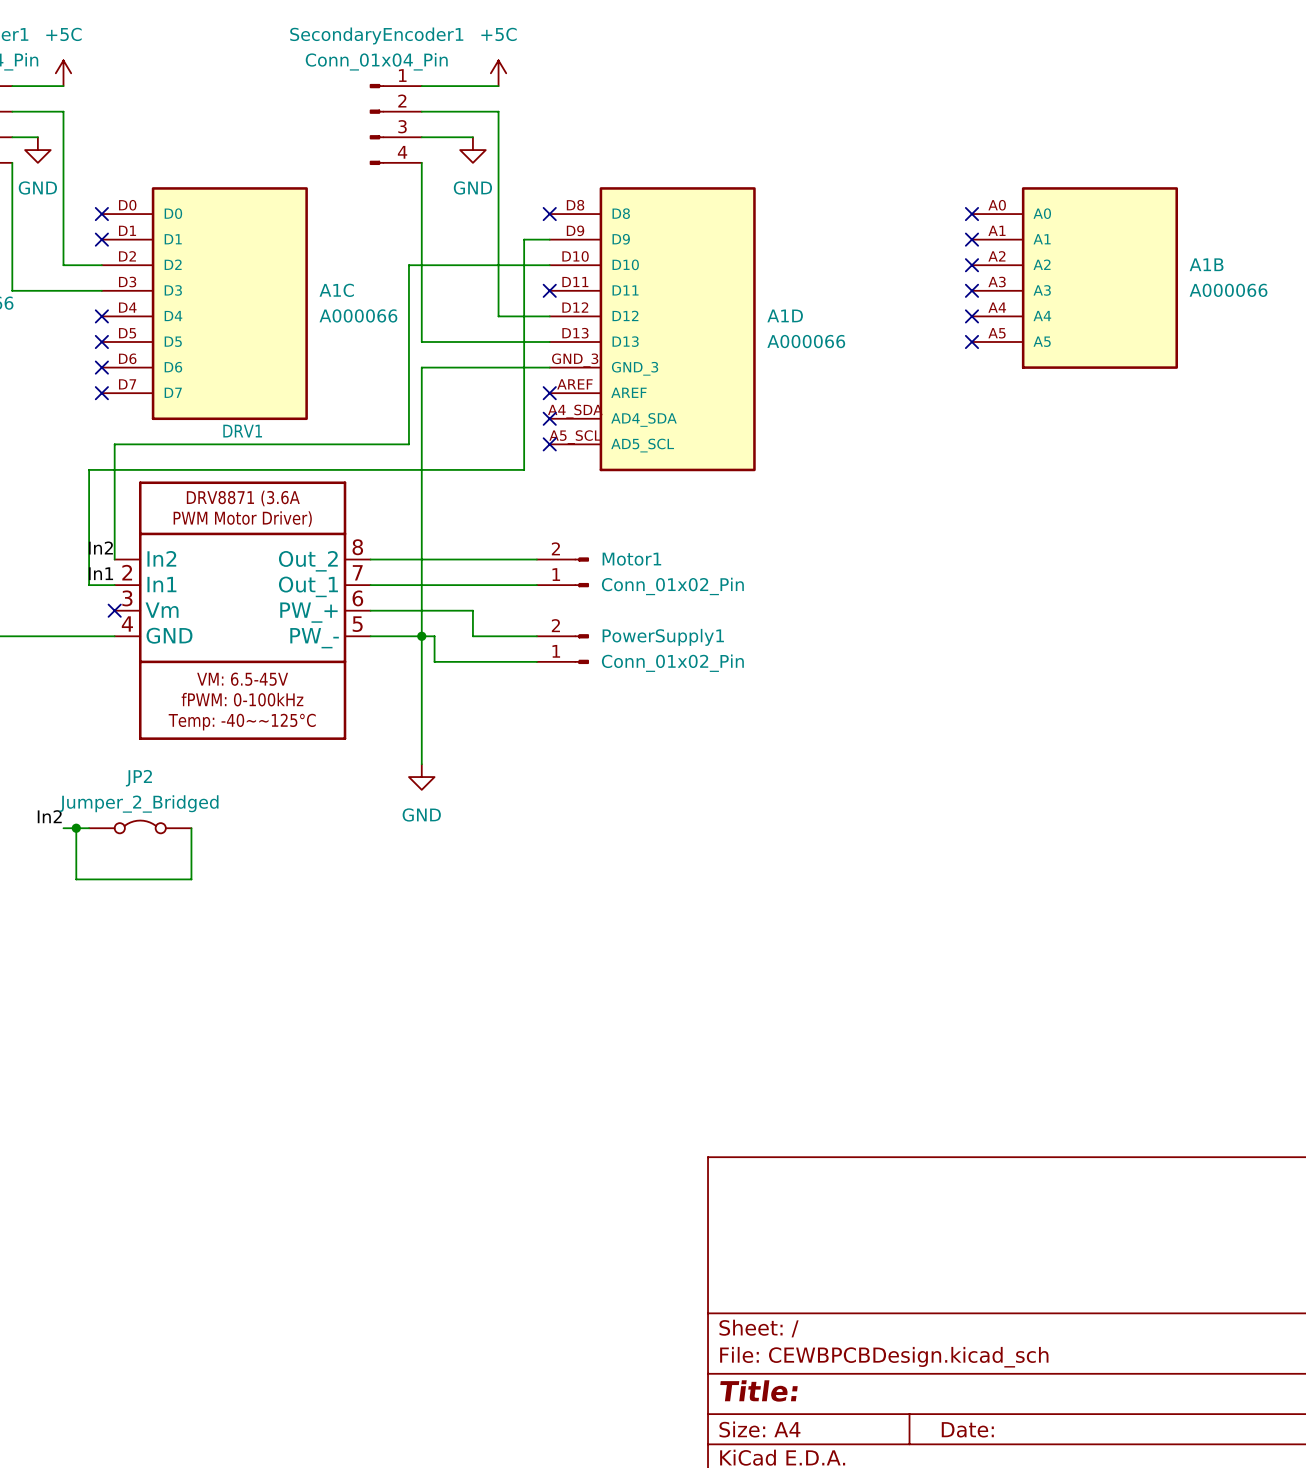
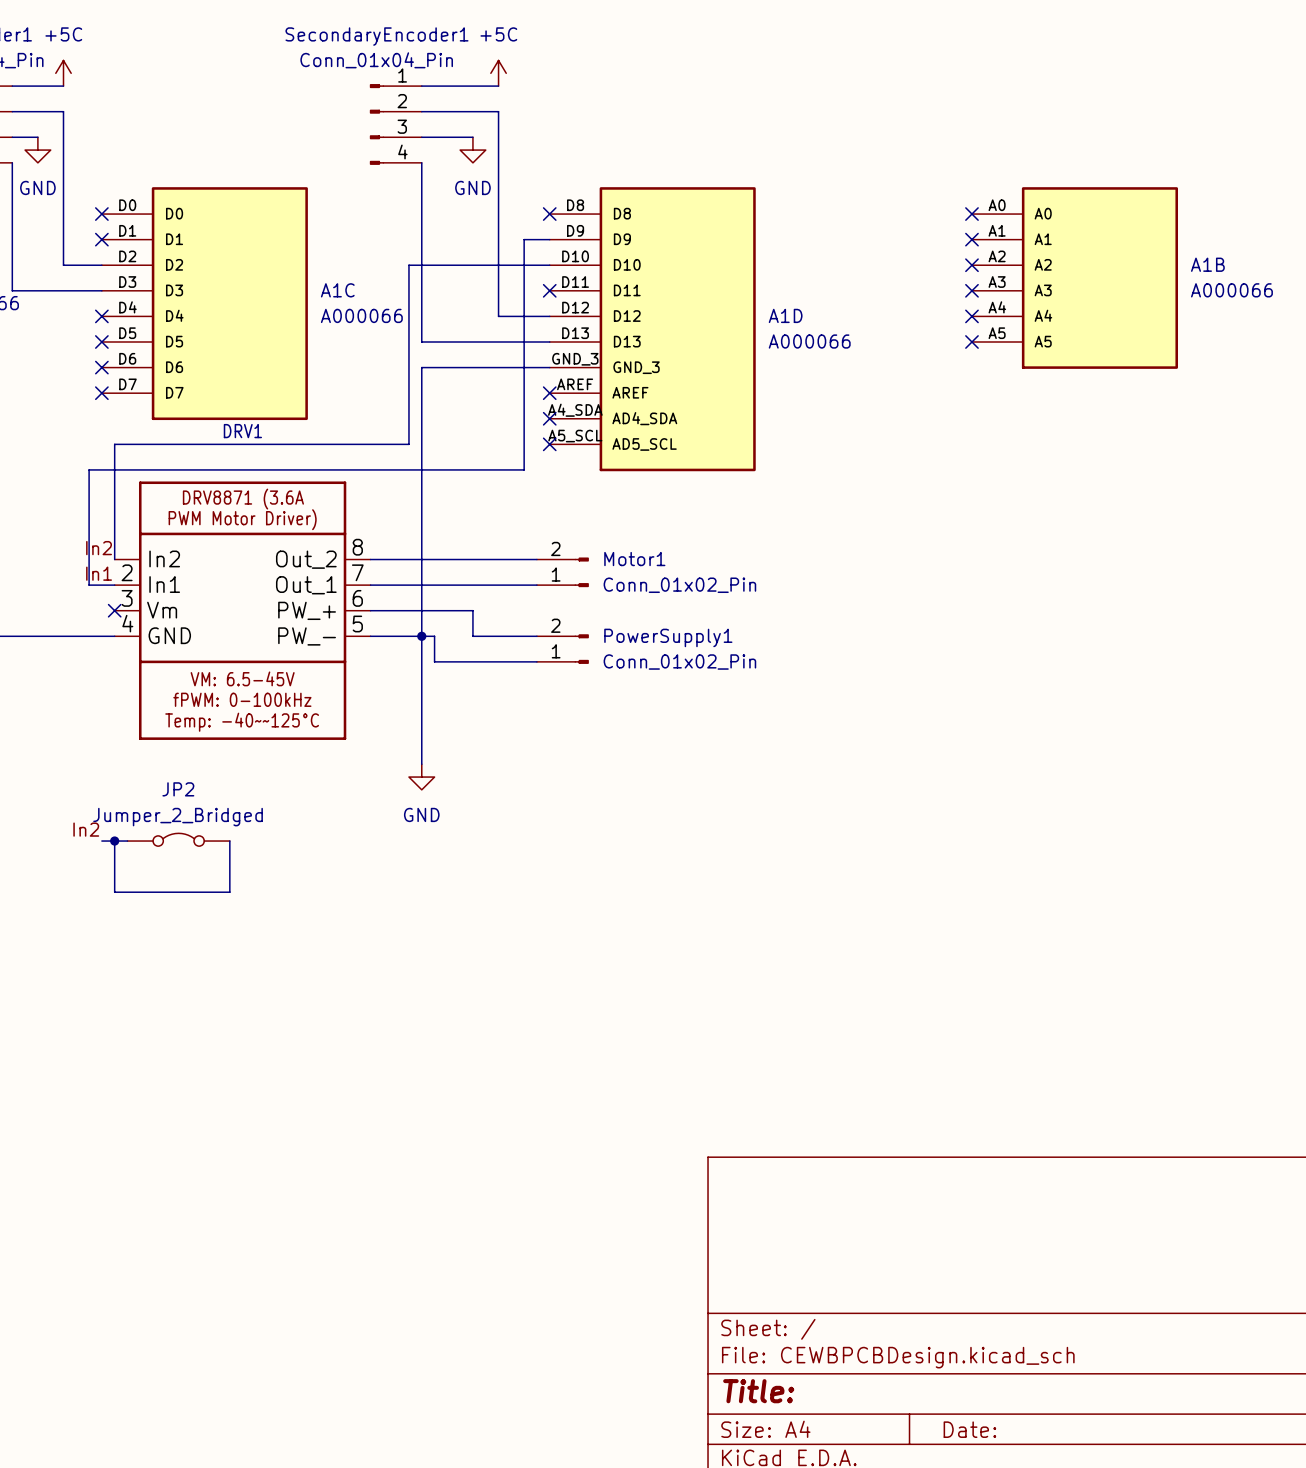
label position: In2 (49, 816) -> In2 (86, 829)
JP2 position: (140, 826) -> (178, 839)
wire: (63, 828) (89, 828) -> (101, 841) (127, 841)
wire: (76, 828) (76, 879) (191, 879) (191, 828) -> (114, 841) (114, 892) (229, 892) (229, 841)
junction position: (76, 828) -> (114, 841)

